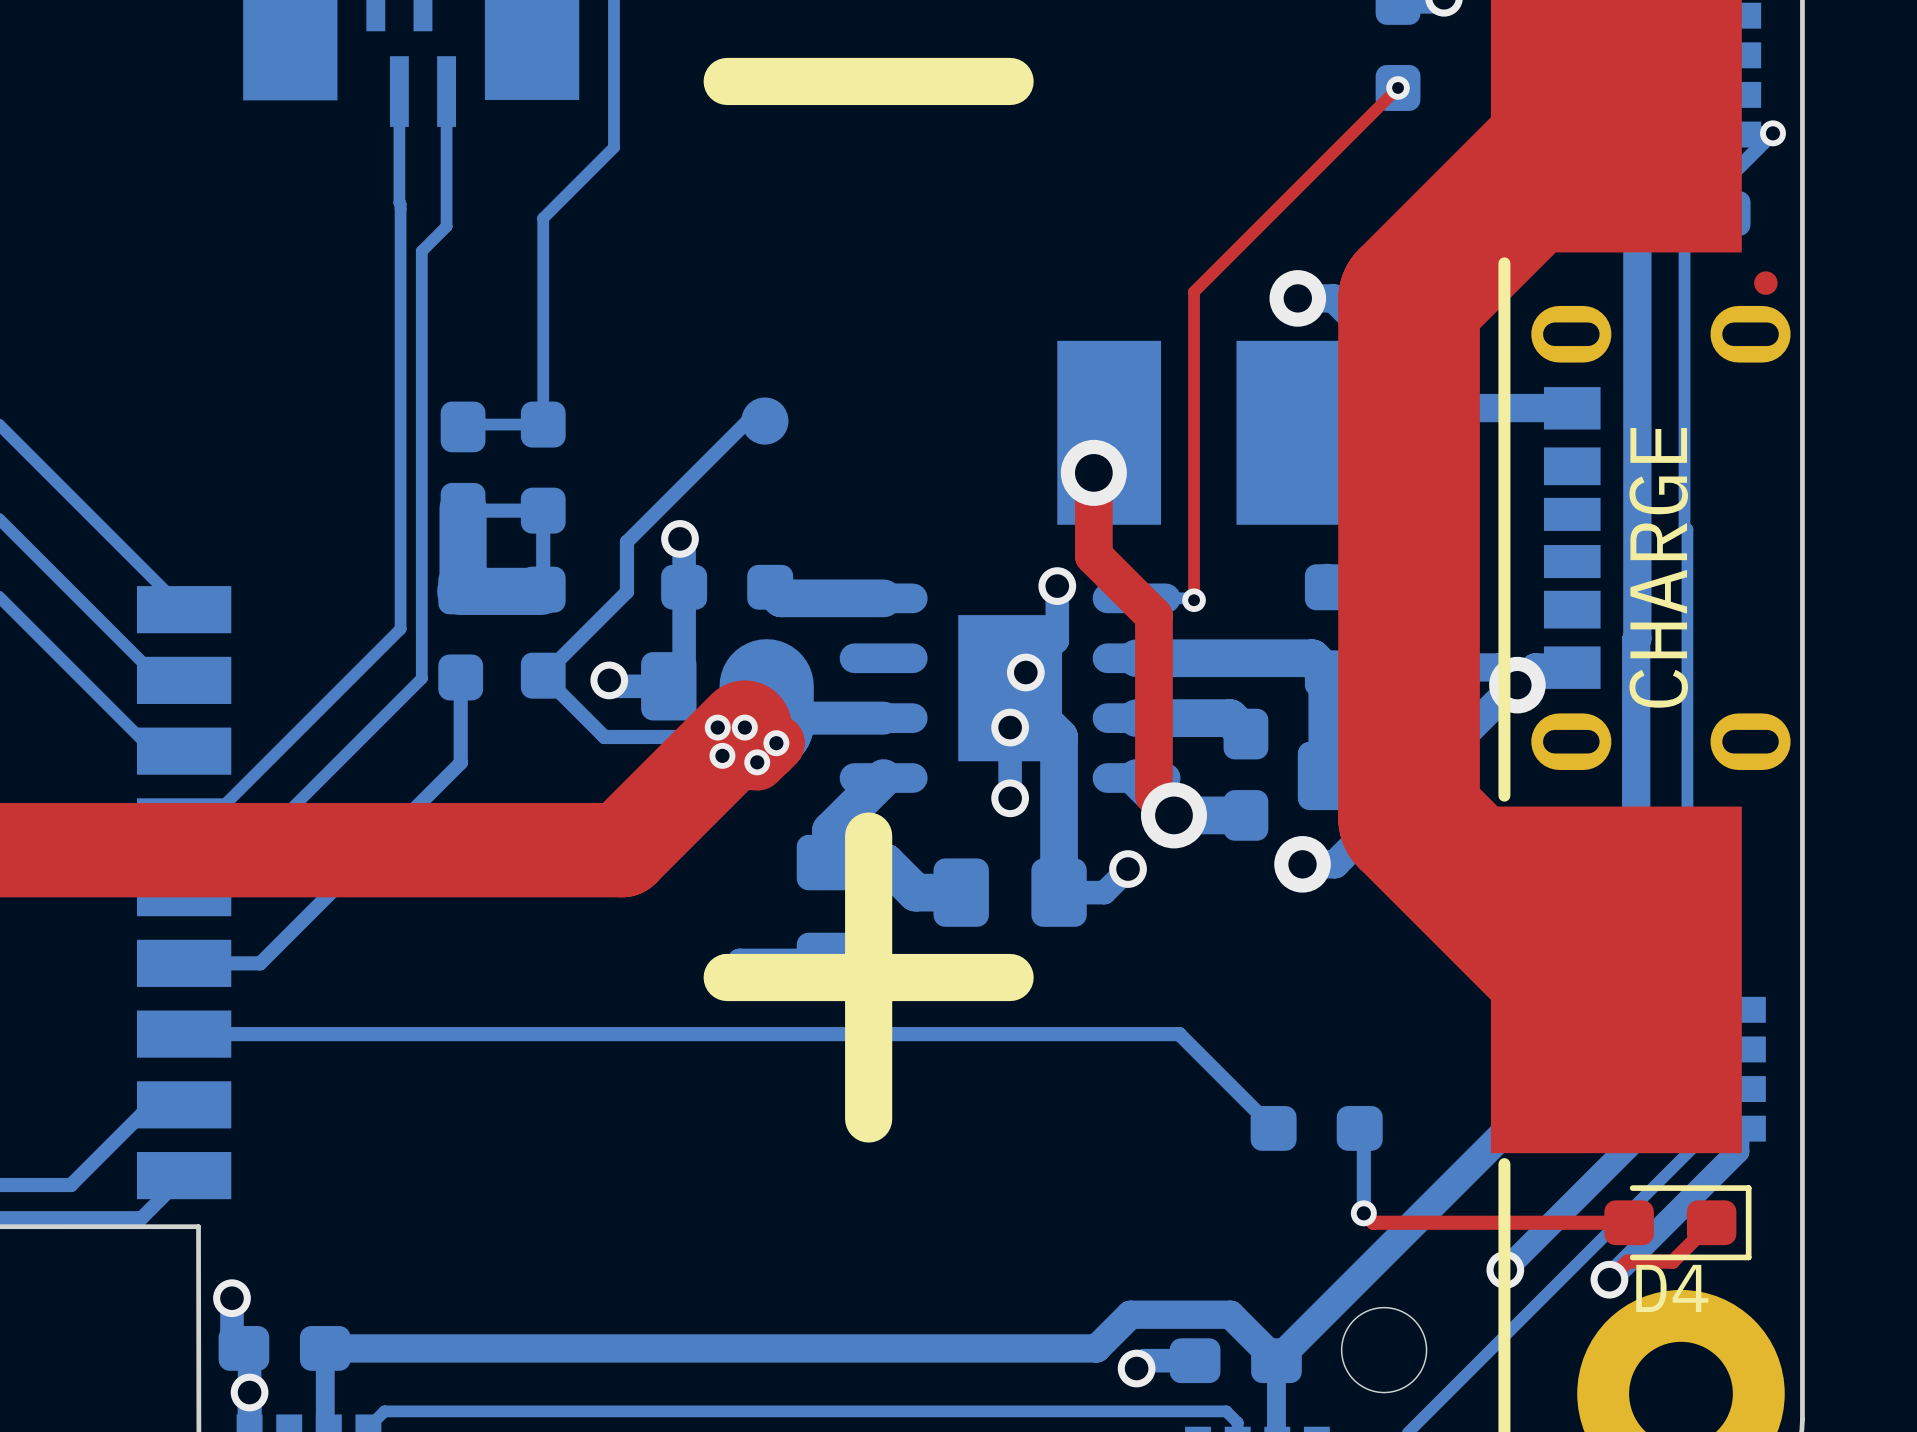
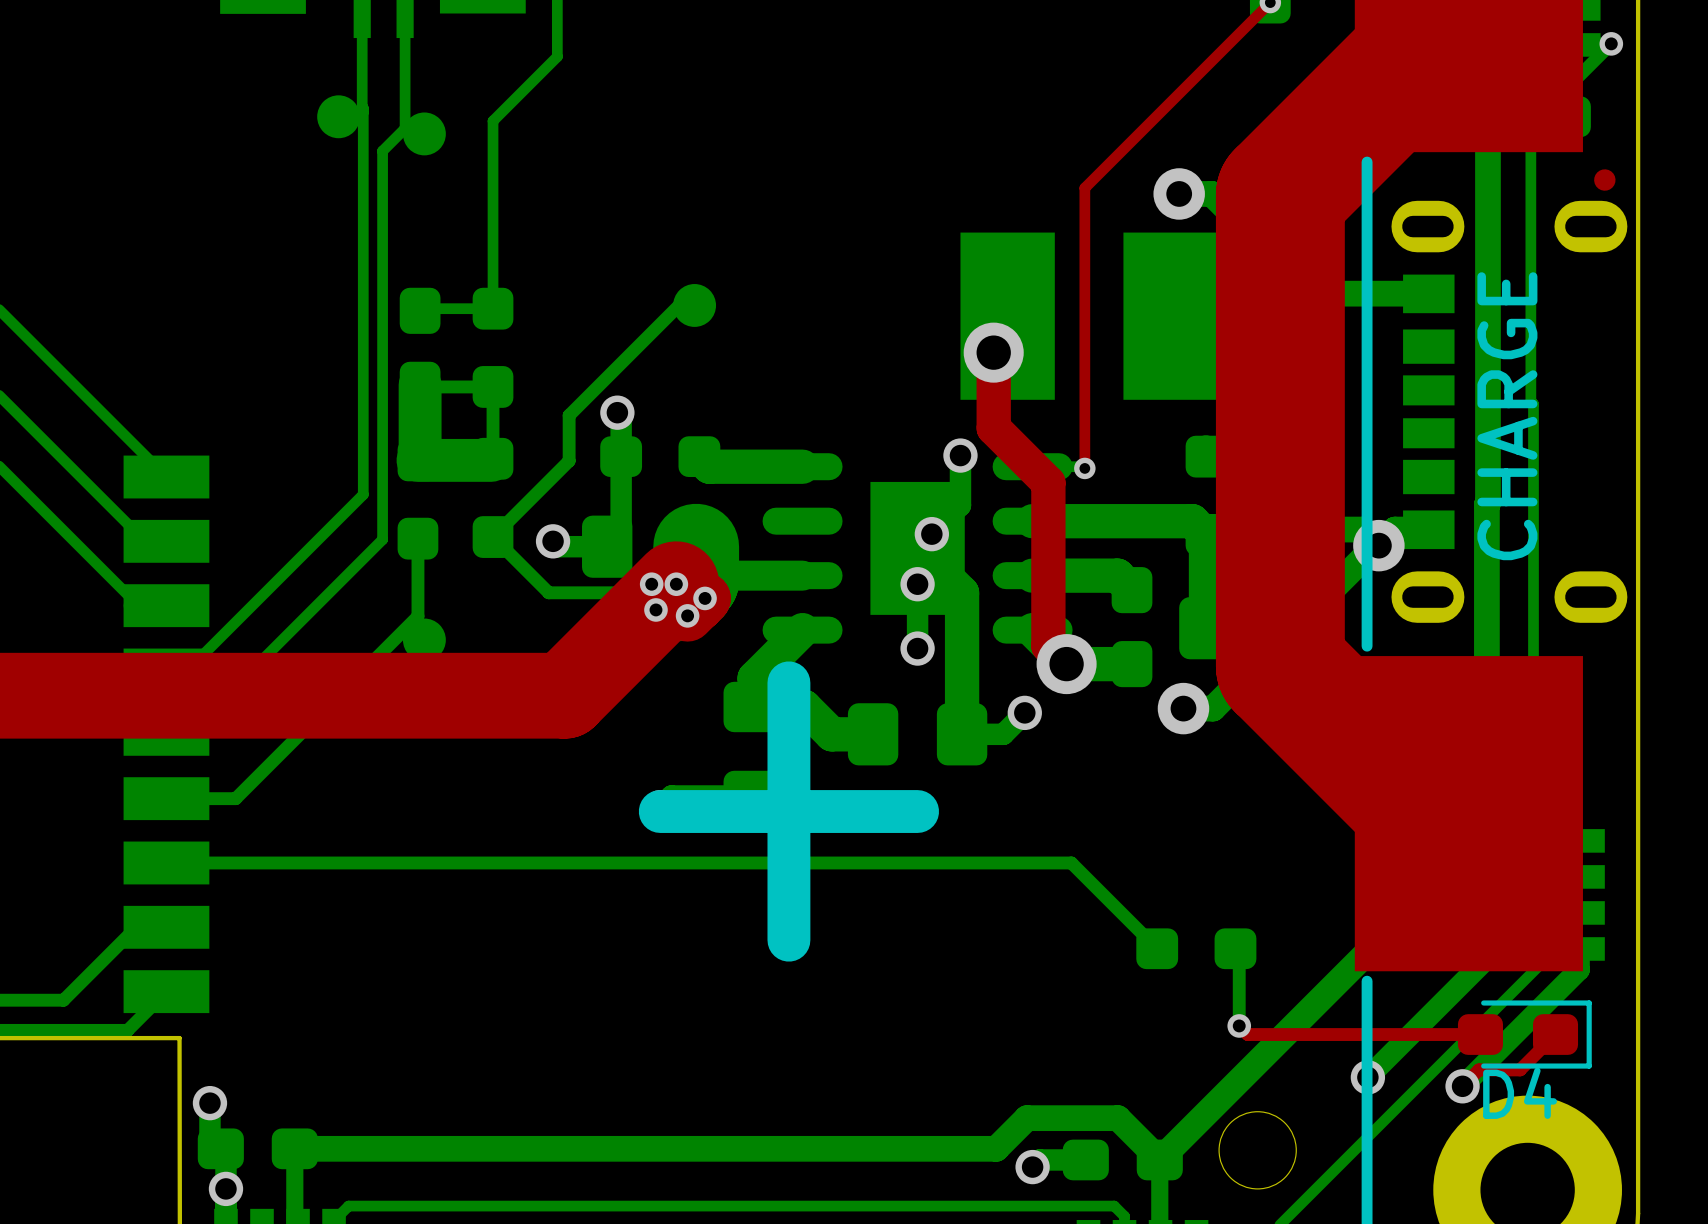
part: none -> (338, 116)
part: none -> (424, 133)
part: none -> (424, 639)

